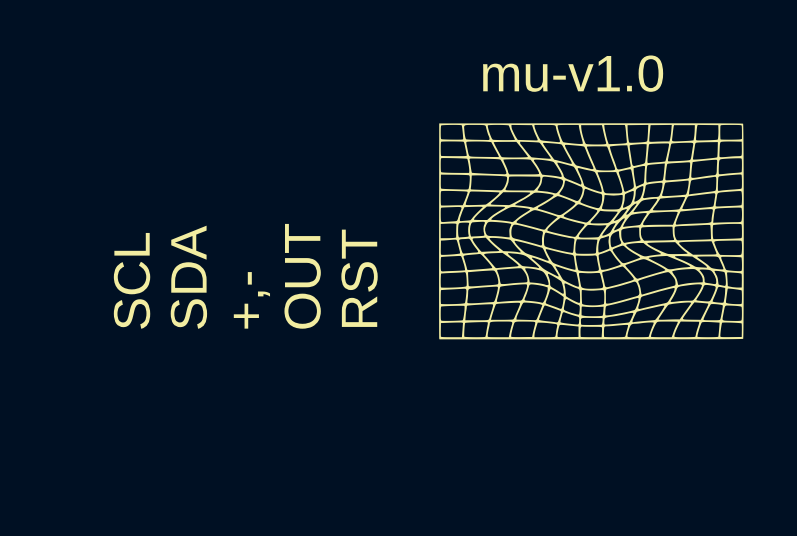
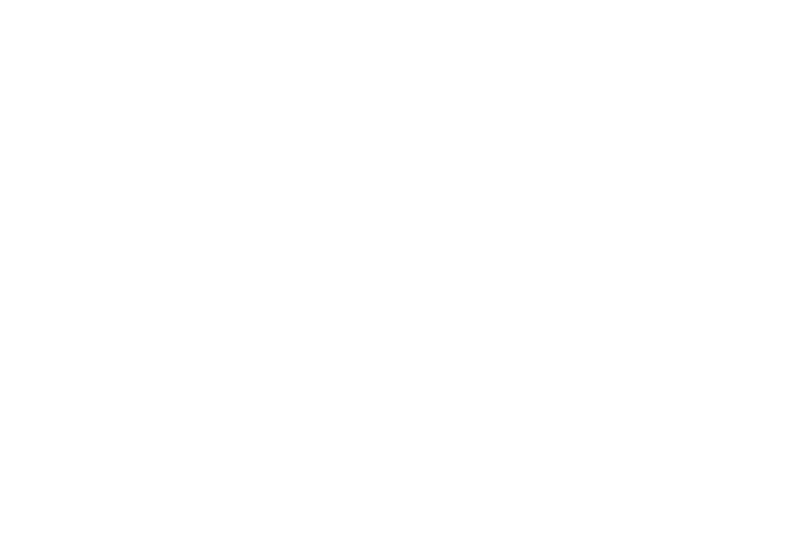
text: mu-v1.0 (573, 73) -> none
drawing: [439, 123, 744, 340] -> none
text: OUT (302, 276) -> none
text: SDA (188, 277) -> none
text: RST (359, 278) -> none
text: SCL (132, 280) -> none
text: +,- (251, 300) -> none

